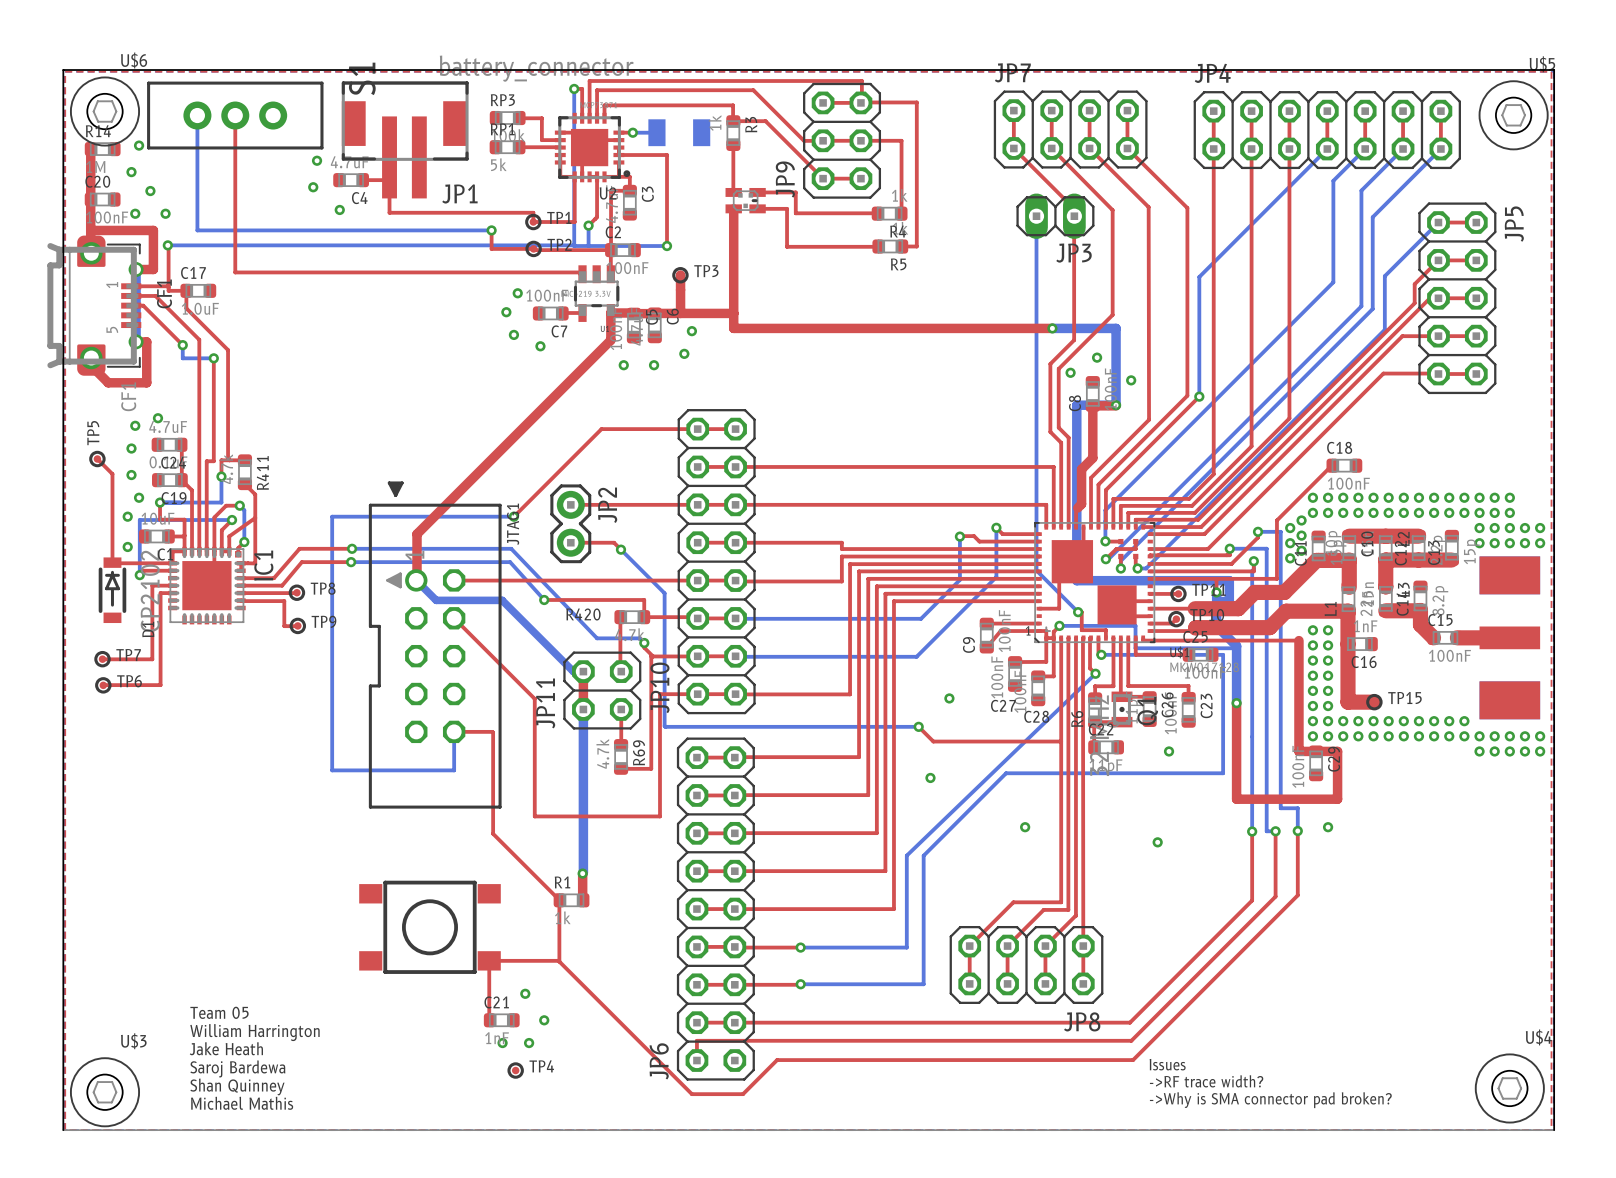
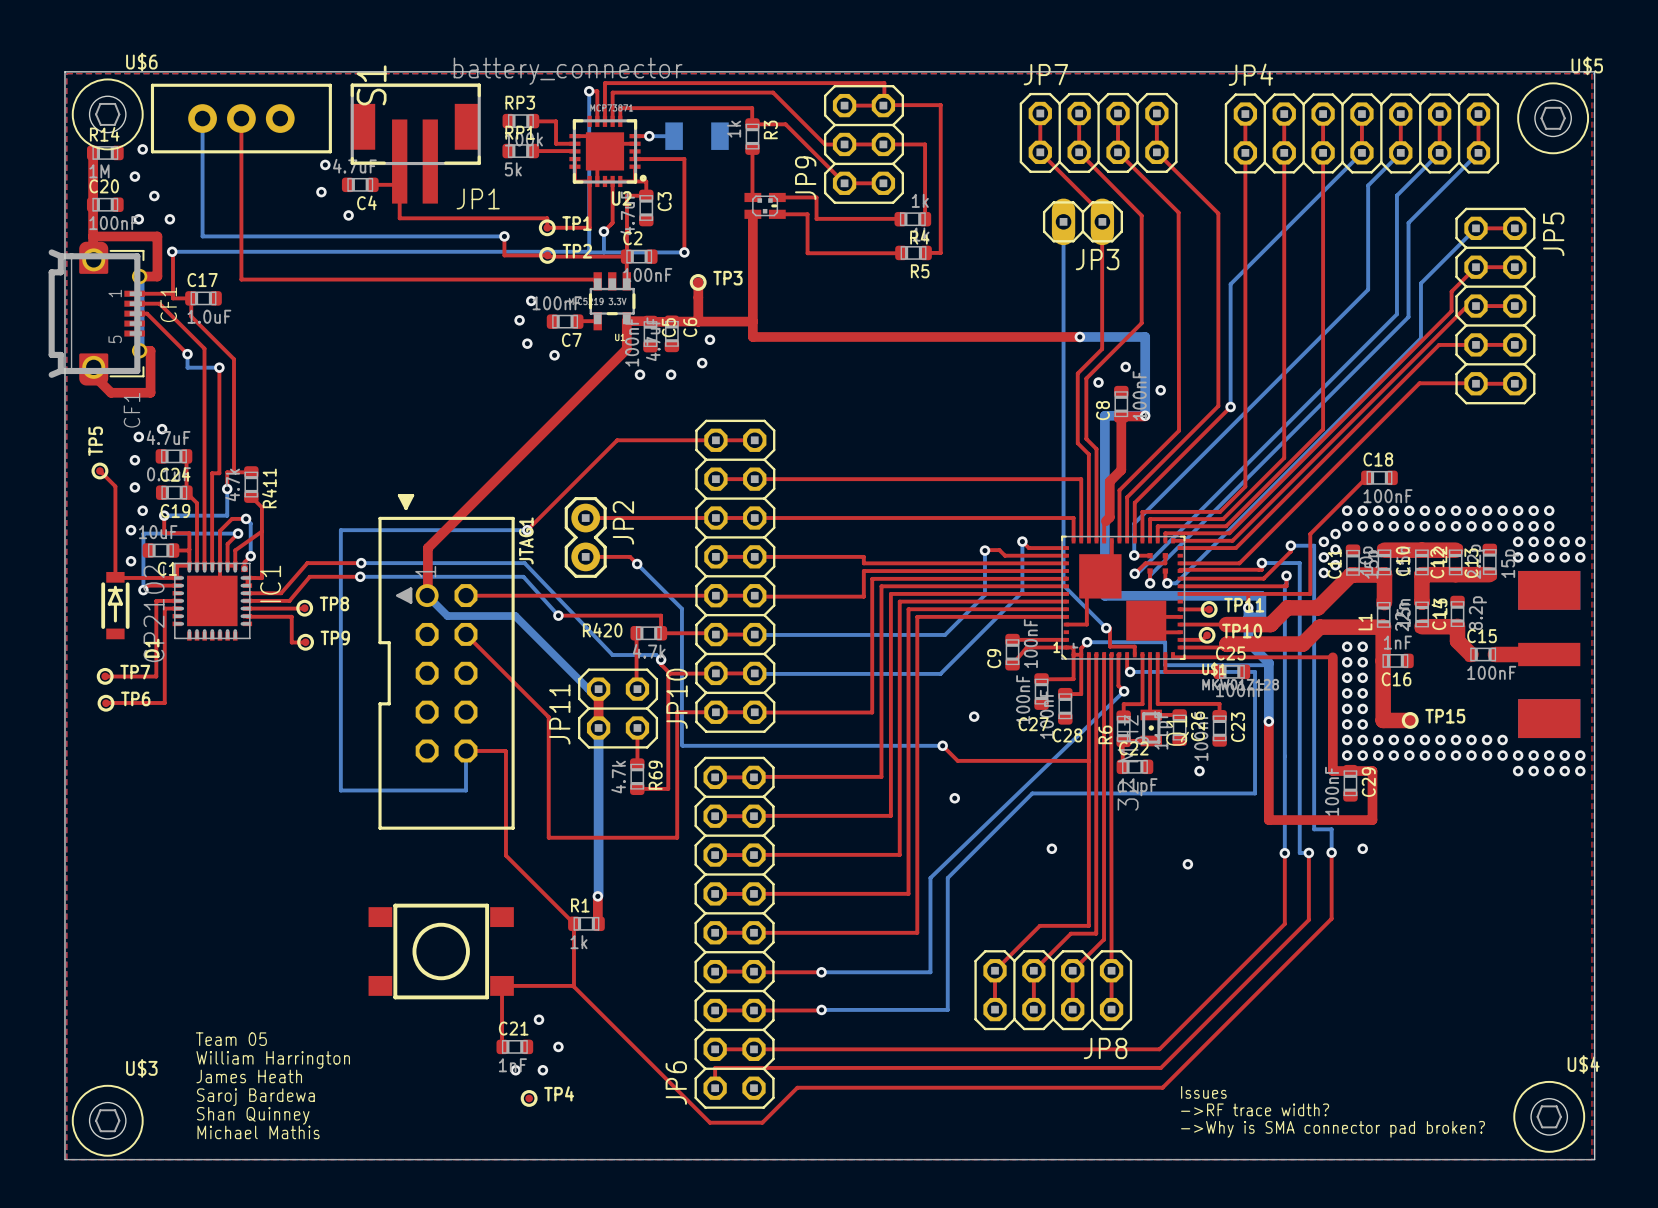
text: Jake Heath (226, 1048) -> James Heath (249, 1076)

